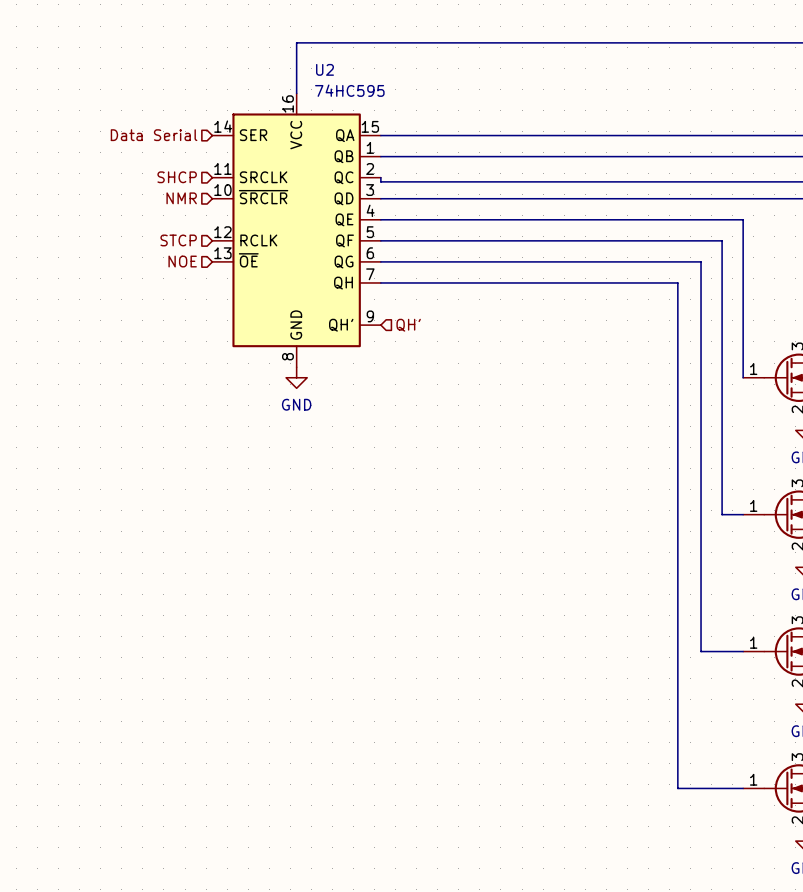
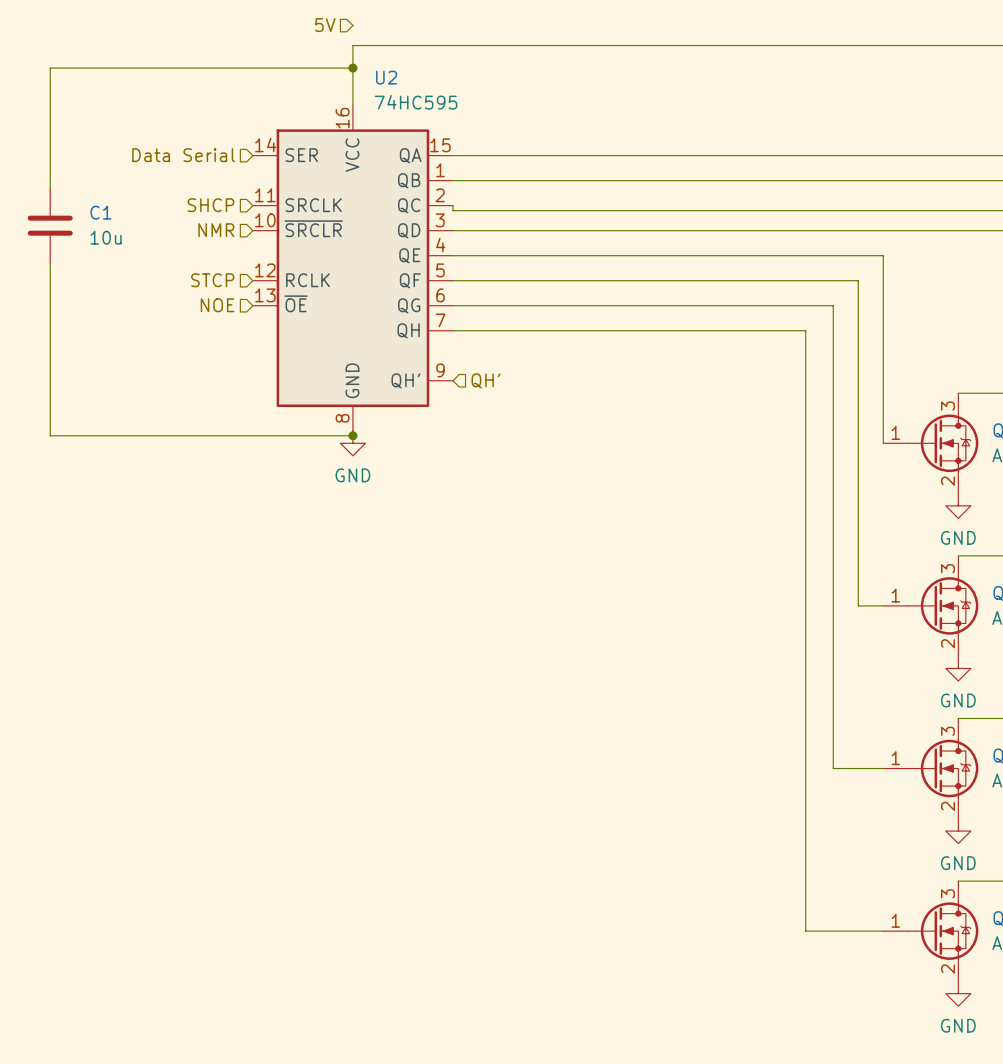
hierarchical label: none -> 5V (325, 25)
wire: none -> (352, 68) (50, 68) (50, 188)
junction: none -> (352, 68)
C1: none -> 10u (50, 225)
wire: none -> (50, 263) (50, 435) (352, 435)
junction: none -> (352, 435)

